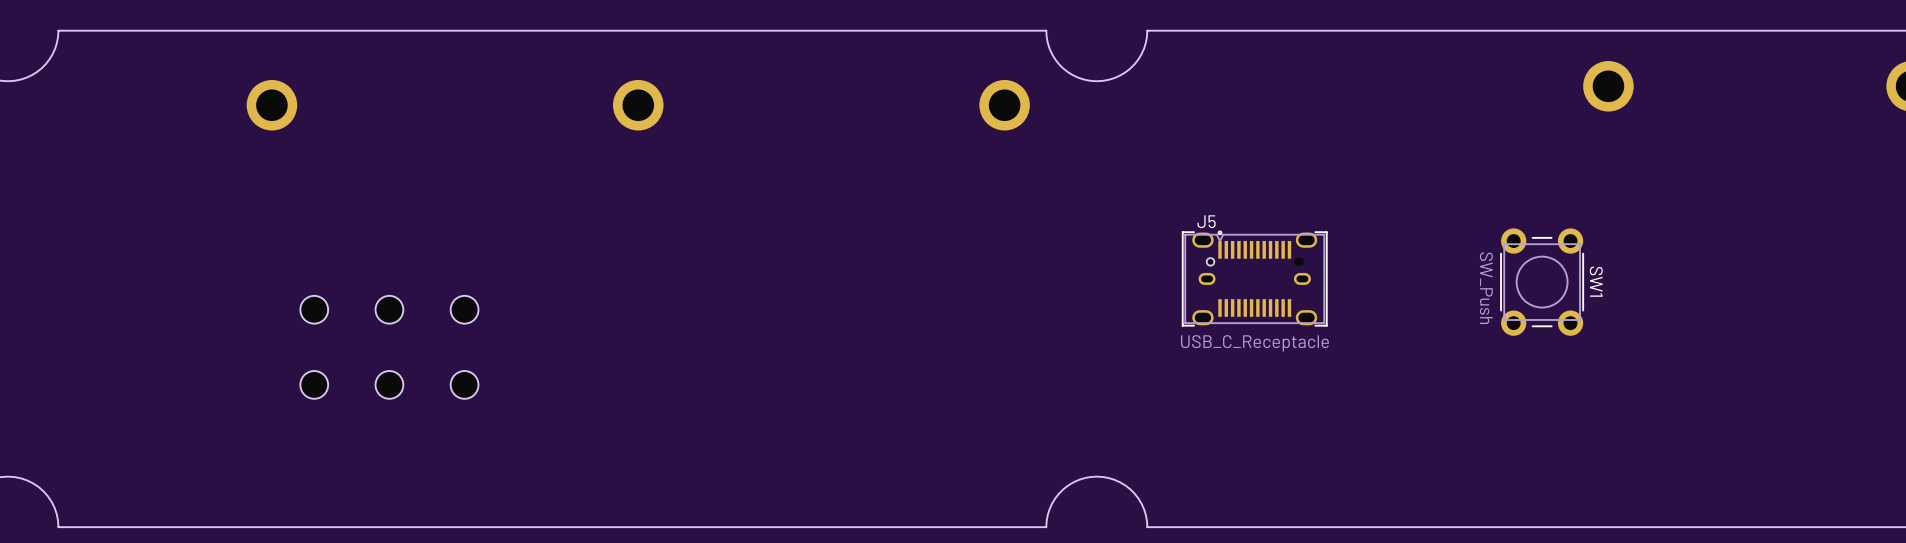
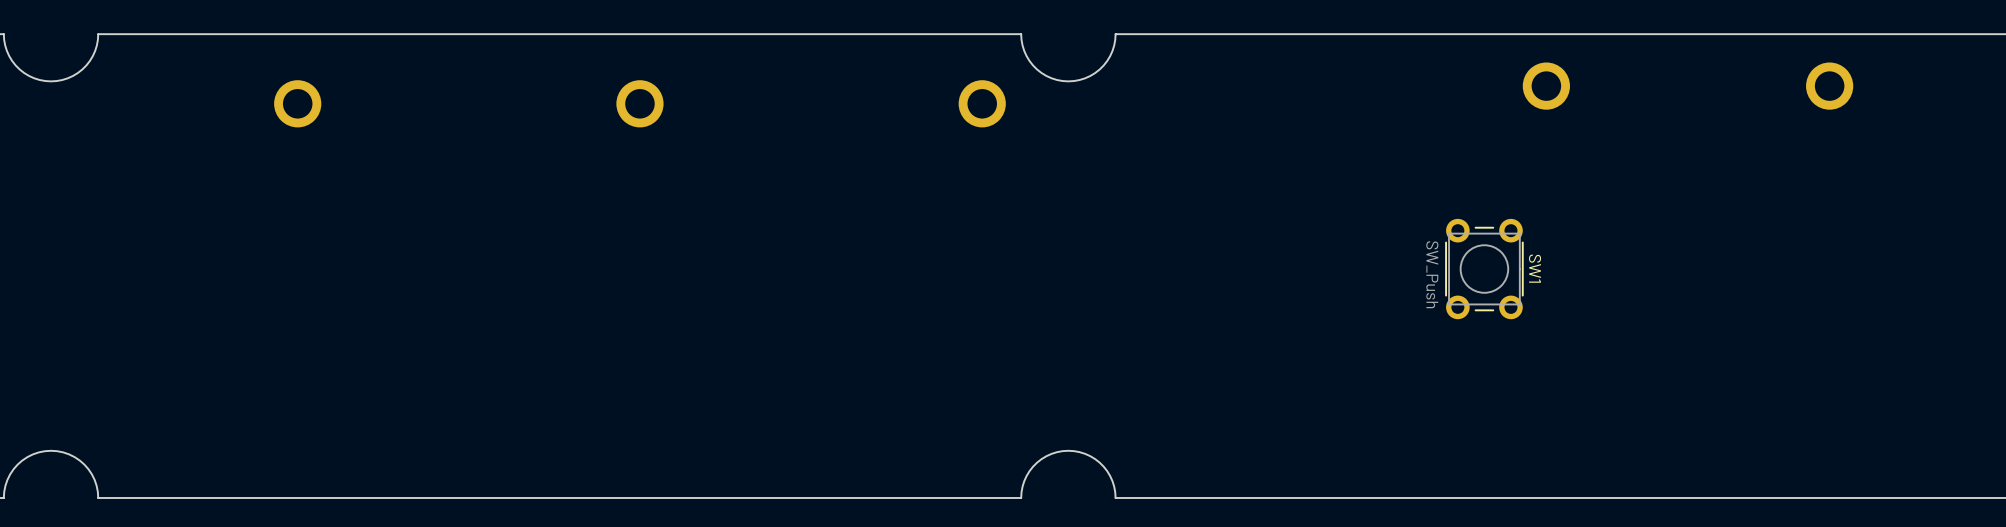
J5: USB_C_Receptacle (1254, 278) -> none
part: (314, 309) -> none
part: (389, 309) -> none
part: (464, 309) -> none
part: (314, 384) -> none
part: (389, 384) -> none
part: (464, 384) -> none

